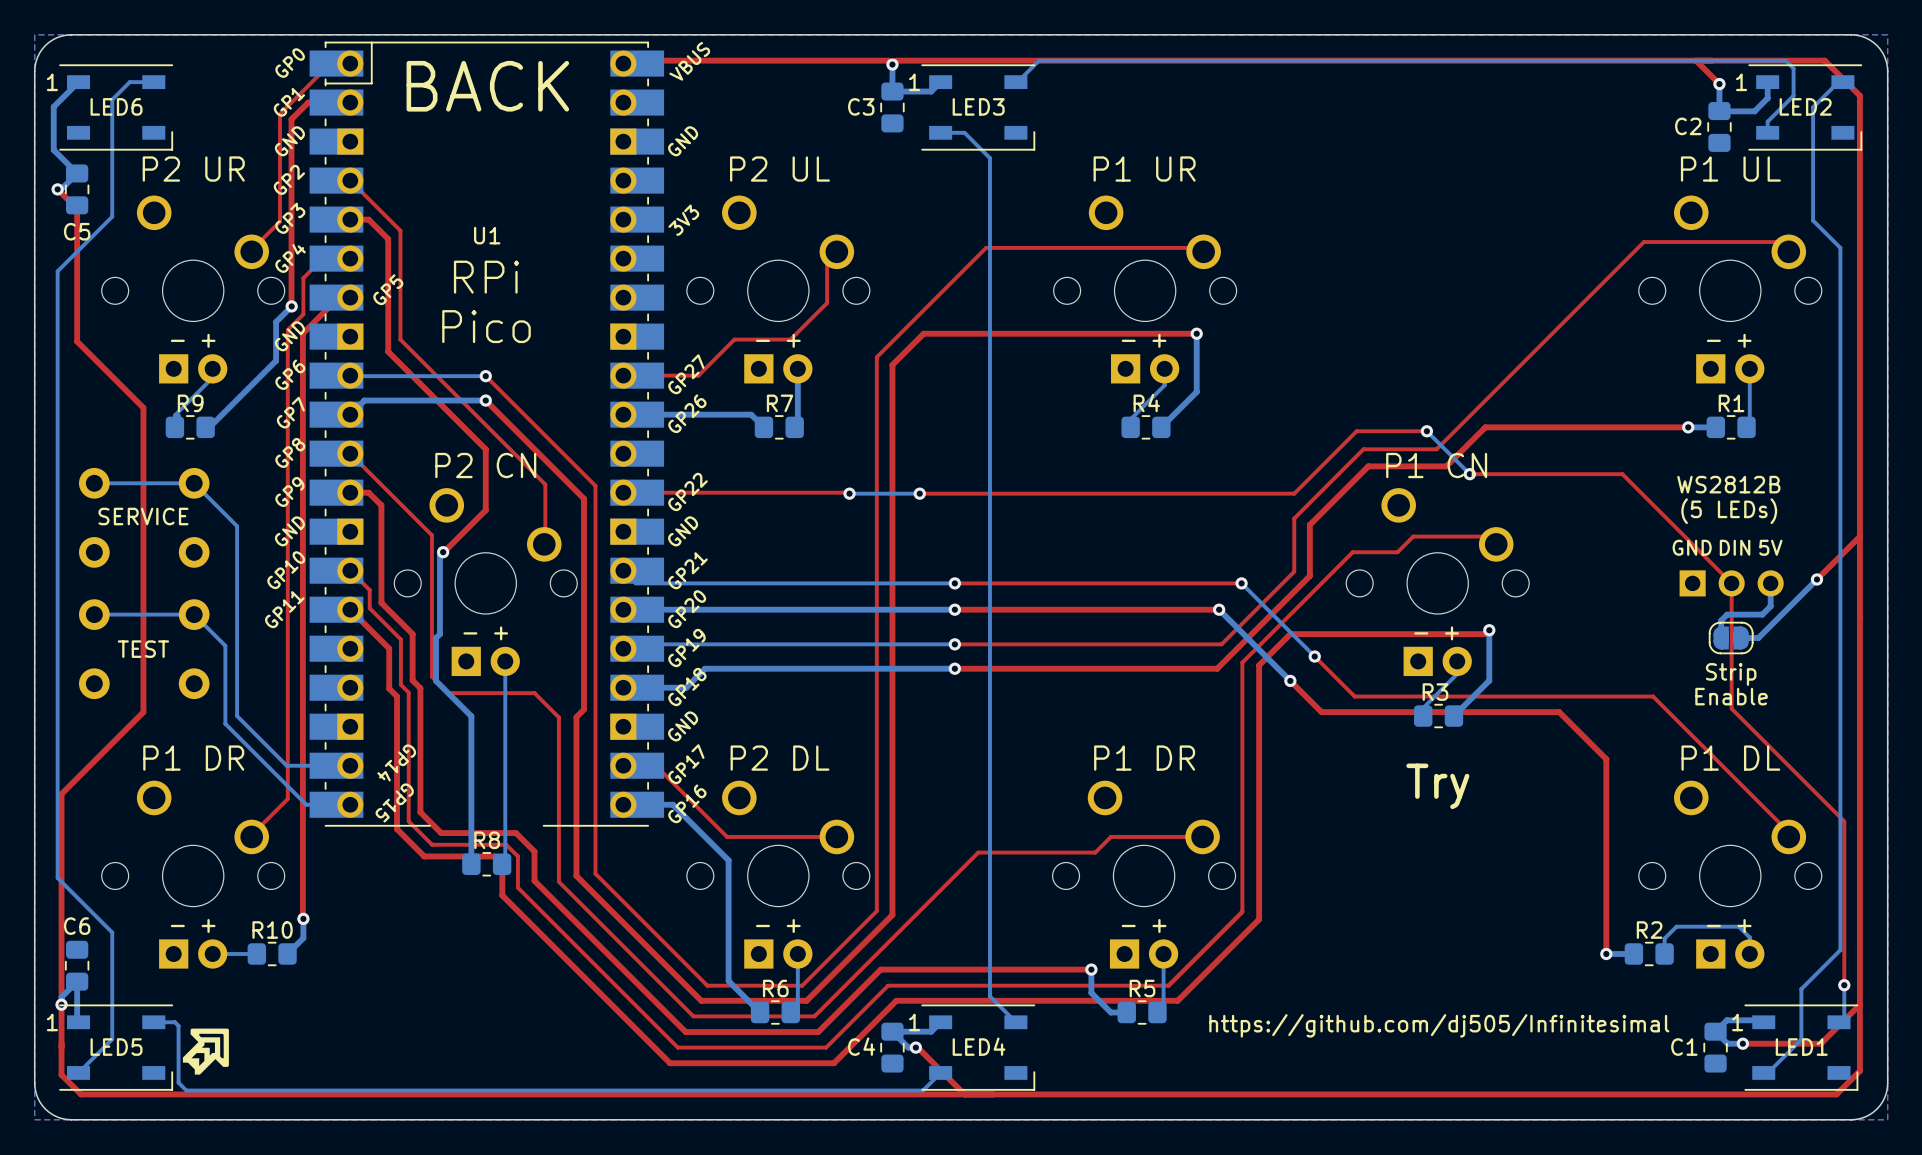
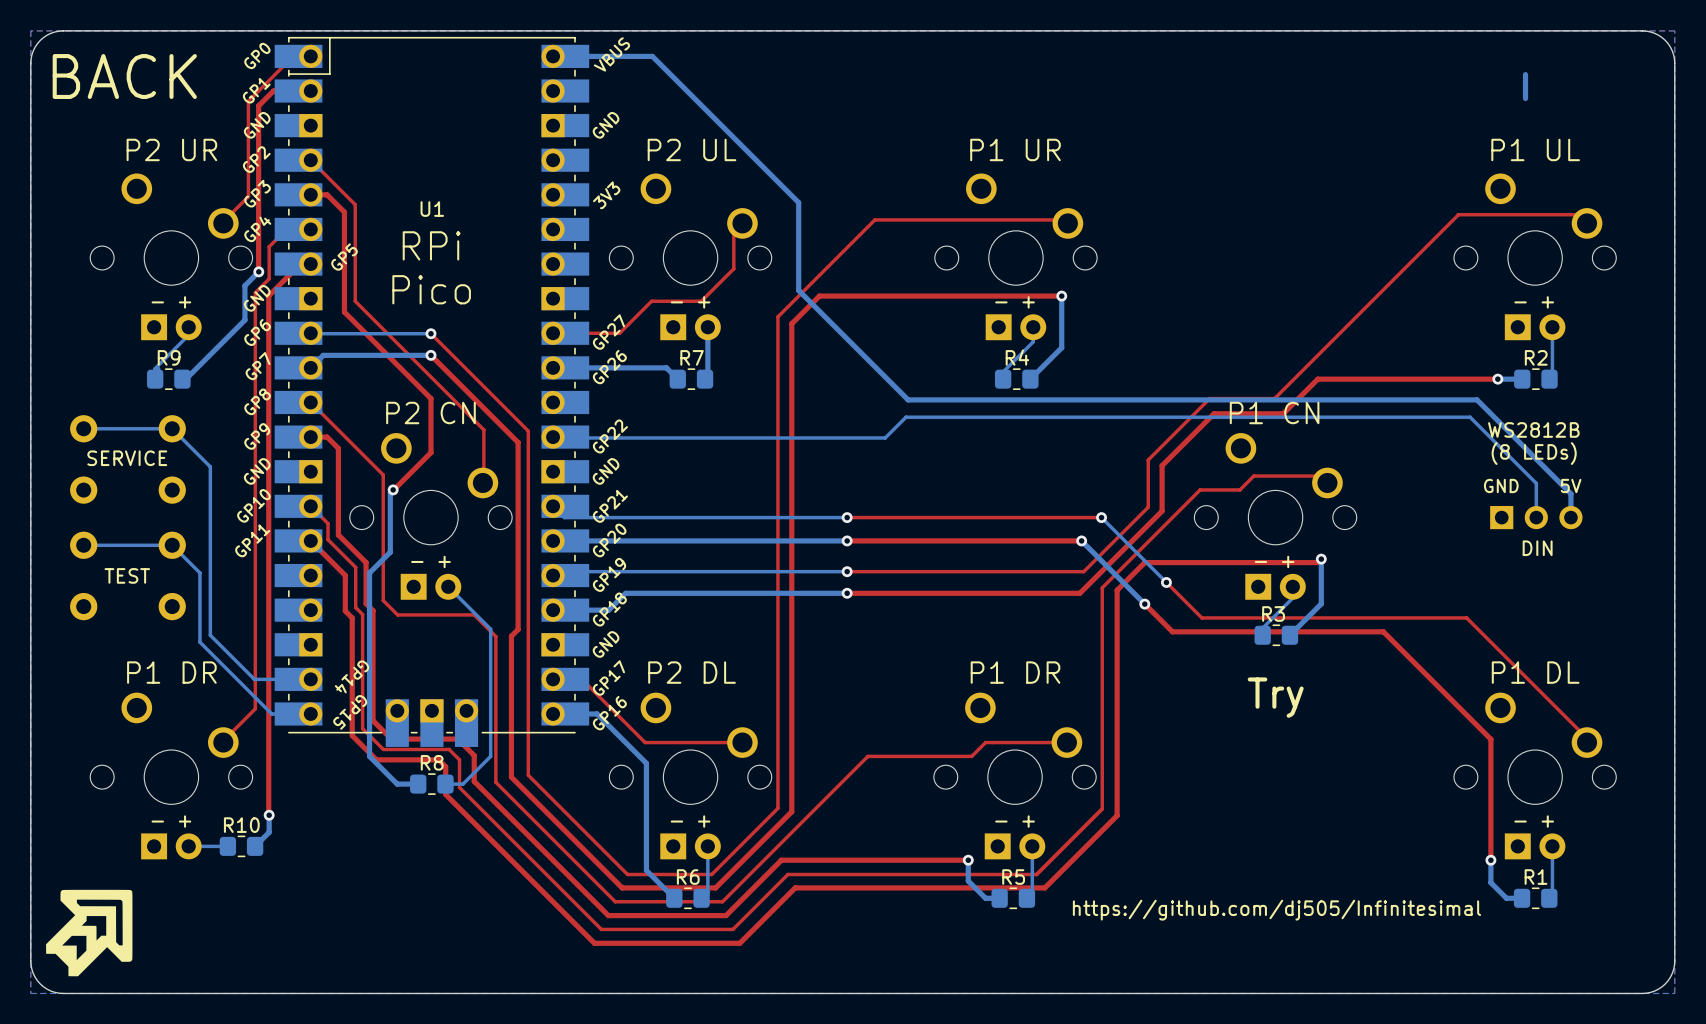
U1 footprint: [309, 41, 665, 827] -> [274, 36, 590, 747]
top track: (1696, 60) (1719, 84) -> none
top track: (623, 63) (626, 60) (888, 60) (892, 64) (896, 60) (1824, 60) (1859, 95) (1859, 1071) (1836, 1094) (81, 1094) (61, 1074) (61, 794) (143, 712) (143, 407) (77, 341) (77, 208) (57, 189) -> none
bottom track: (892, 64) (892, 91) (931, 91) (940, 82) -> none
via: (892, 64) -> none
bottom track: (78, 82) (53, 106) (53, 150) (77, 173) (61, 189) (57, 189) -> none
bottom track: (153, 82) (129, 82) (112, 99) (112, 216) (57, 271) (57, 877) (112, 932) (112, 1039) (78, 1072) -> none
bottom track: (1015, 82) (1039, 60) (1785, 60) (1793, 68) (1793, 95) (1767, 121) (1767, 132) -> none
bottom track: (1767, 82) (1767, 98) (1754, 111) (1723, 111) -> none
bottom track: (1842, 82) (1838, 82) (1813, 107) (1813, 220) (1840, 247) (1840, 950) (1801, 989) (1801, 1039) (1767, 1072) (1763, 1072) -> none
via: (1719, 84) -> none
text position: BACK (487, 86) -> BACK (124, 76)
LED6: (116, 107) -> none
C3: (892, 107) -> none
LED3: (978, 107) -> none
LED2: (1805, 107) -> none
C2: (1719, 126) -> none
bottom track: (940, 132) (964, 132) (989, 158) (989, 996) (1015, 1022) -> none
via: (57, 189) -> none
C5: (77, 189) -> none
R1 name: R1 (1731, 403) -> R2 (1536, 357)
top track: (1426, 431) (1356, 431) (1294, 493) (919, 493) -> none
bottom track: (1426, 431) (1469, 474) -> none
via: (1426, 431) -> none
top track: (1469, 474) (1622, 474) (1731, 583) (1731, 708) (1844, 821) (1844, 985) -> none
via: (1469, 474) -> none
top track: (623, 492) (849, 493) -> none
bottom track: none -> (553, 437) (753, 437)
via: (849, 493) -> none
bottom track: none -> (816, 437) (885, 437) (906, 417) (1470, 417) (1536, 483) (1536, 517)
via: (919, 493) -> none
text: (5 LEDs) (1729, 511) -> (8 LEDs) (1534, 453)
top track: (1859, 536) (1816, 579) -> none
text position: DIN (1735, 547) -> DIN (1537, 548)
bottom track: (1816, 579) (1758, 638) (1741, 638) -> none
via: (1816, 579) -> none
bottom track: (1770, 583) (1770, 606) (1762, 614) (1727, 614) (1721, 620) (1721, 638) -> (1570, 517) (1570, 493) (1477, 399) (908, 399) (798, 290) (798, 202) (652, 56) (553, 56)
bottom track: (439, 622) (439, 634) (436, 638) (436, 680) (471, 716) (471, 864) -> (390, 552) (369, 572) (369, 756) (397, 784) (418, 784)
part: (1731, 638) -> none
bottom track: (505, 661) (505, 861) (502, 864) -> (448, 586) (490, 629) (490, 756) (462, 784) (445, 784)
text: Strip (1731, 674) -> none
text: Enable (1731, 696) -> none
top track: (1606, 759) (1606, 953) -> (1425, 673) (1490, 739) (1490, 860)
R8 position: (486, 864) -> (431, 784)
via: (1606, 953) -> none
bottom track: (1633, 953) (1606, 953) -> none
R2: (1649, 953) -> none
bottom track: (1749, 953) (1749, 937) (1738, 926) (1676, 926) (1664, 938) (1664, 953) -> (1552, 846) (1552, 895) (1549, 898)
C6: (77, 965) -> none
bottom track: none -> (1490, 860) (1490, 882) (1506, 898) (1522, 898)
via: none -> (1490, 860)
bottom track: (1844, 985) (1844, 1016) (1839, 1022) -> none
via: (1844, 985) -> none
drawing: none -> [46, 889, 133, 977]
bottom track: (61, 1004) (61, 997) (77, 981) (78, 1022) -> none
via: (61, 1004) -> none
top track: (1859, 1004) (1820, 1043) (1742, 1043) -> none
R1: none -> (1535, 898)
bottom track: (153, 1022) (174, 1022) (178, 1025) (178, 1082) (186, 1090) (923, 1090) (940, 1072) -> none
bottom track: (940, 1022) (931, 1031) (892, 1031) (908, 1047) (915, 1047) -> none
bottom track: (1763, 1022) (1761, 1020) (1726, 1020) (1715, 1031) (1727, 1043) (1742, 1043) -> none
drawing: [182, 1028, 229, 1075] -> none
via: (1742, 1043) -> none
LED5: (116, 1047) -> none
C4: (892, 1047) -> none
top track: (915, 1047) (964, 1094) -> none
via: (915, 1047) -> none
LED4: (978, 1047) -> none
C1: (1715, 1047) -> none
LED1: (1801, 1047) -> none

